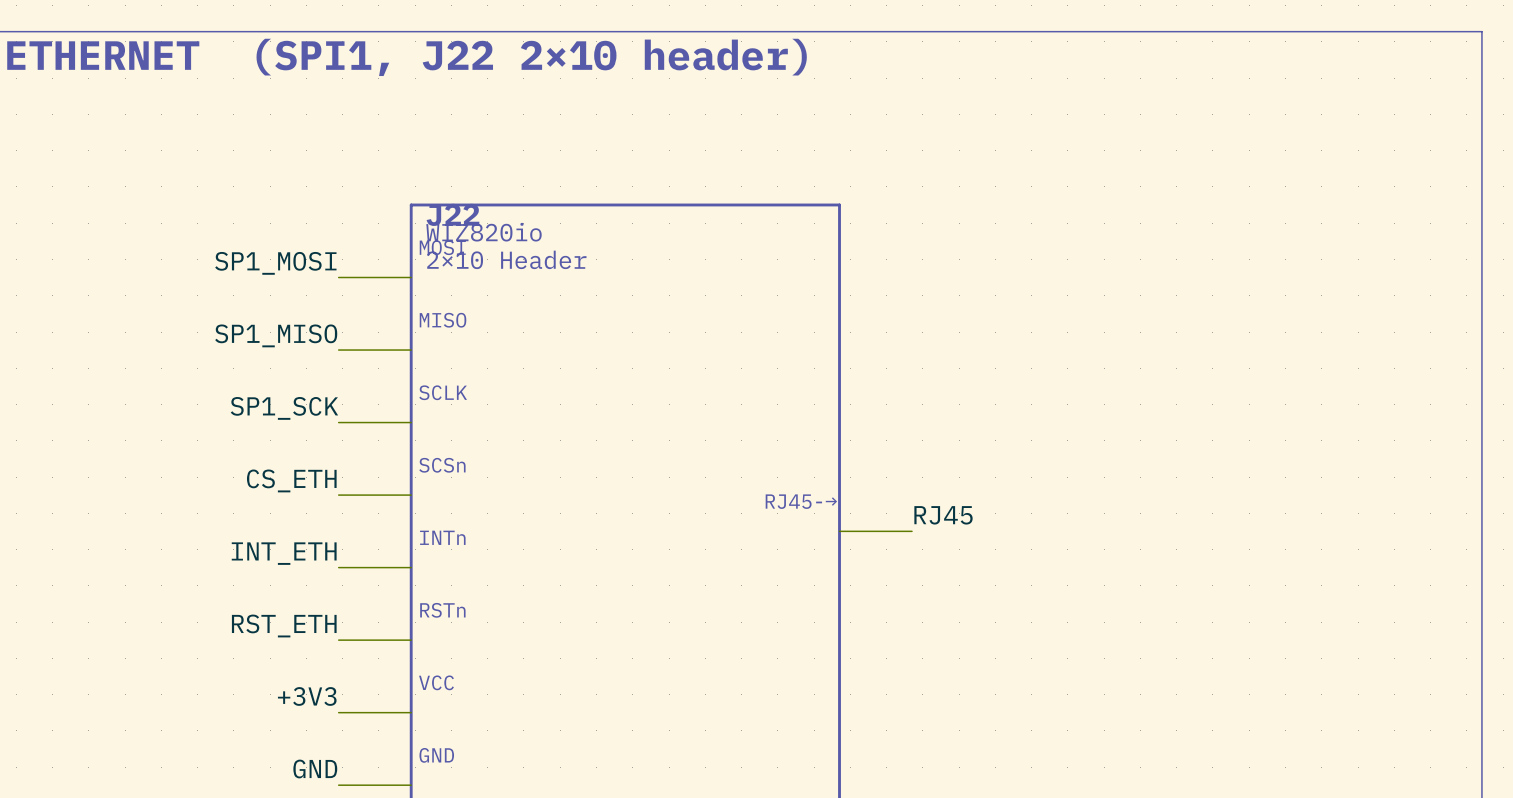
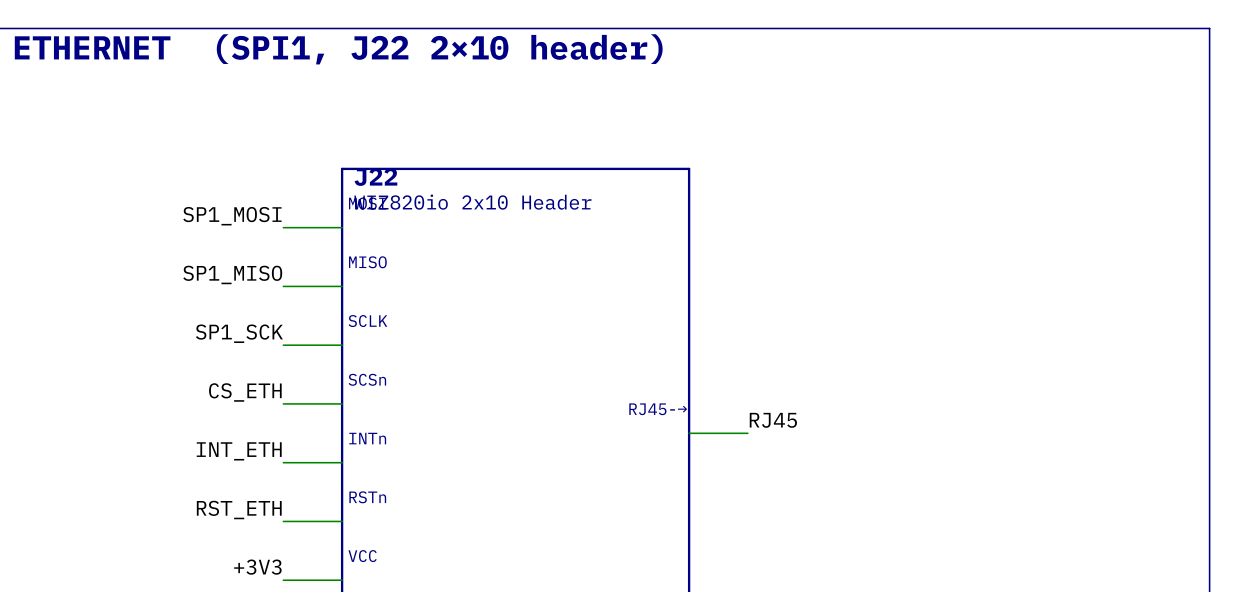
text: WIZ820io (484, 232) -> none
text: 2×10 Header (506, 259) -> WIZ820io 2x10 Header (472, 202)

